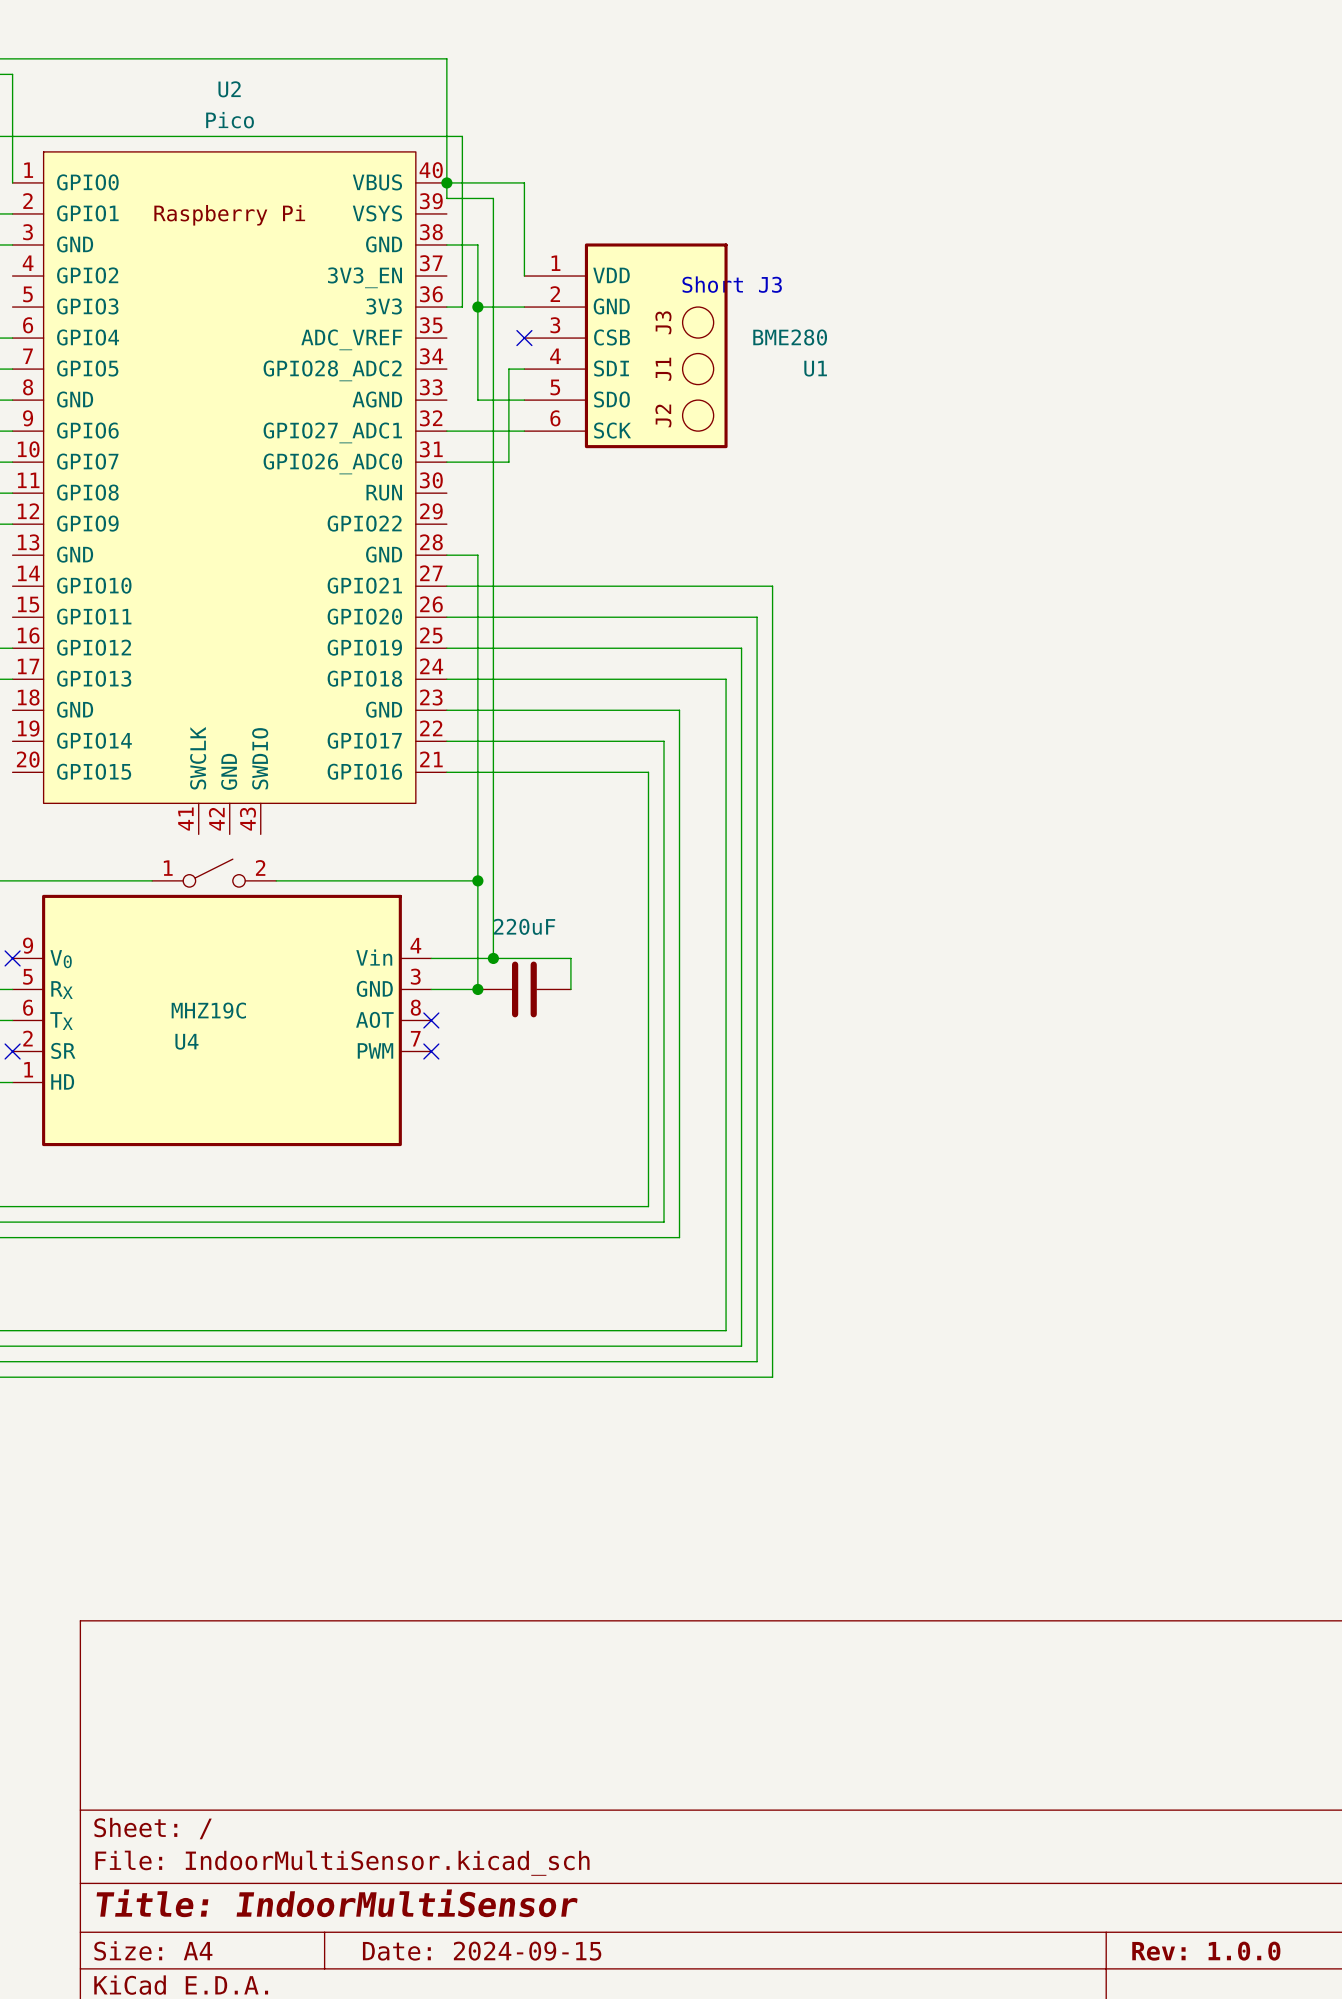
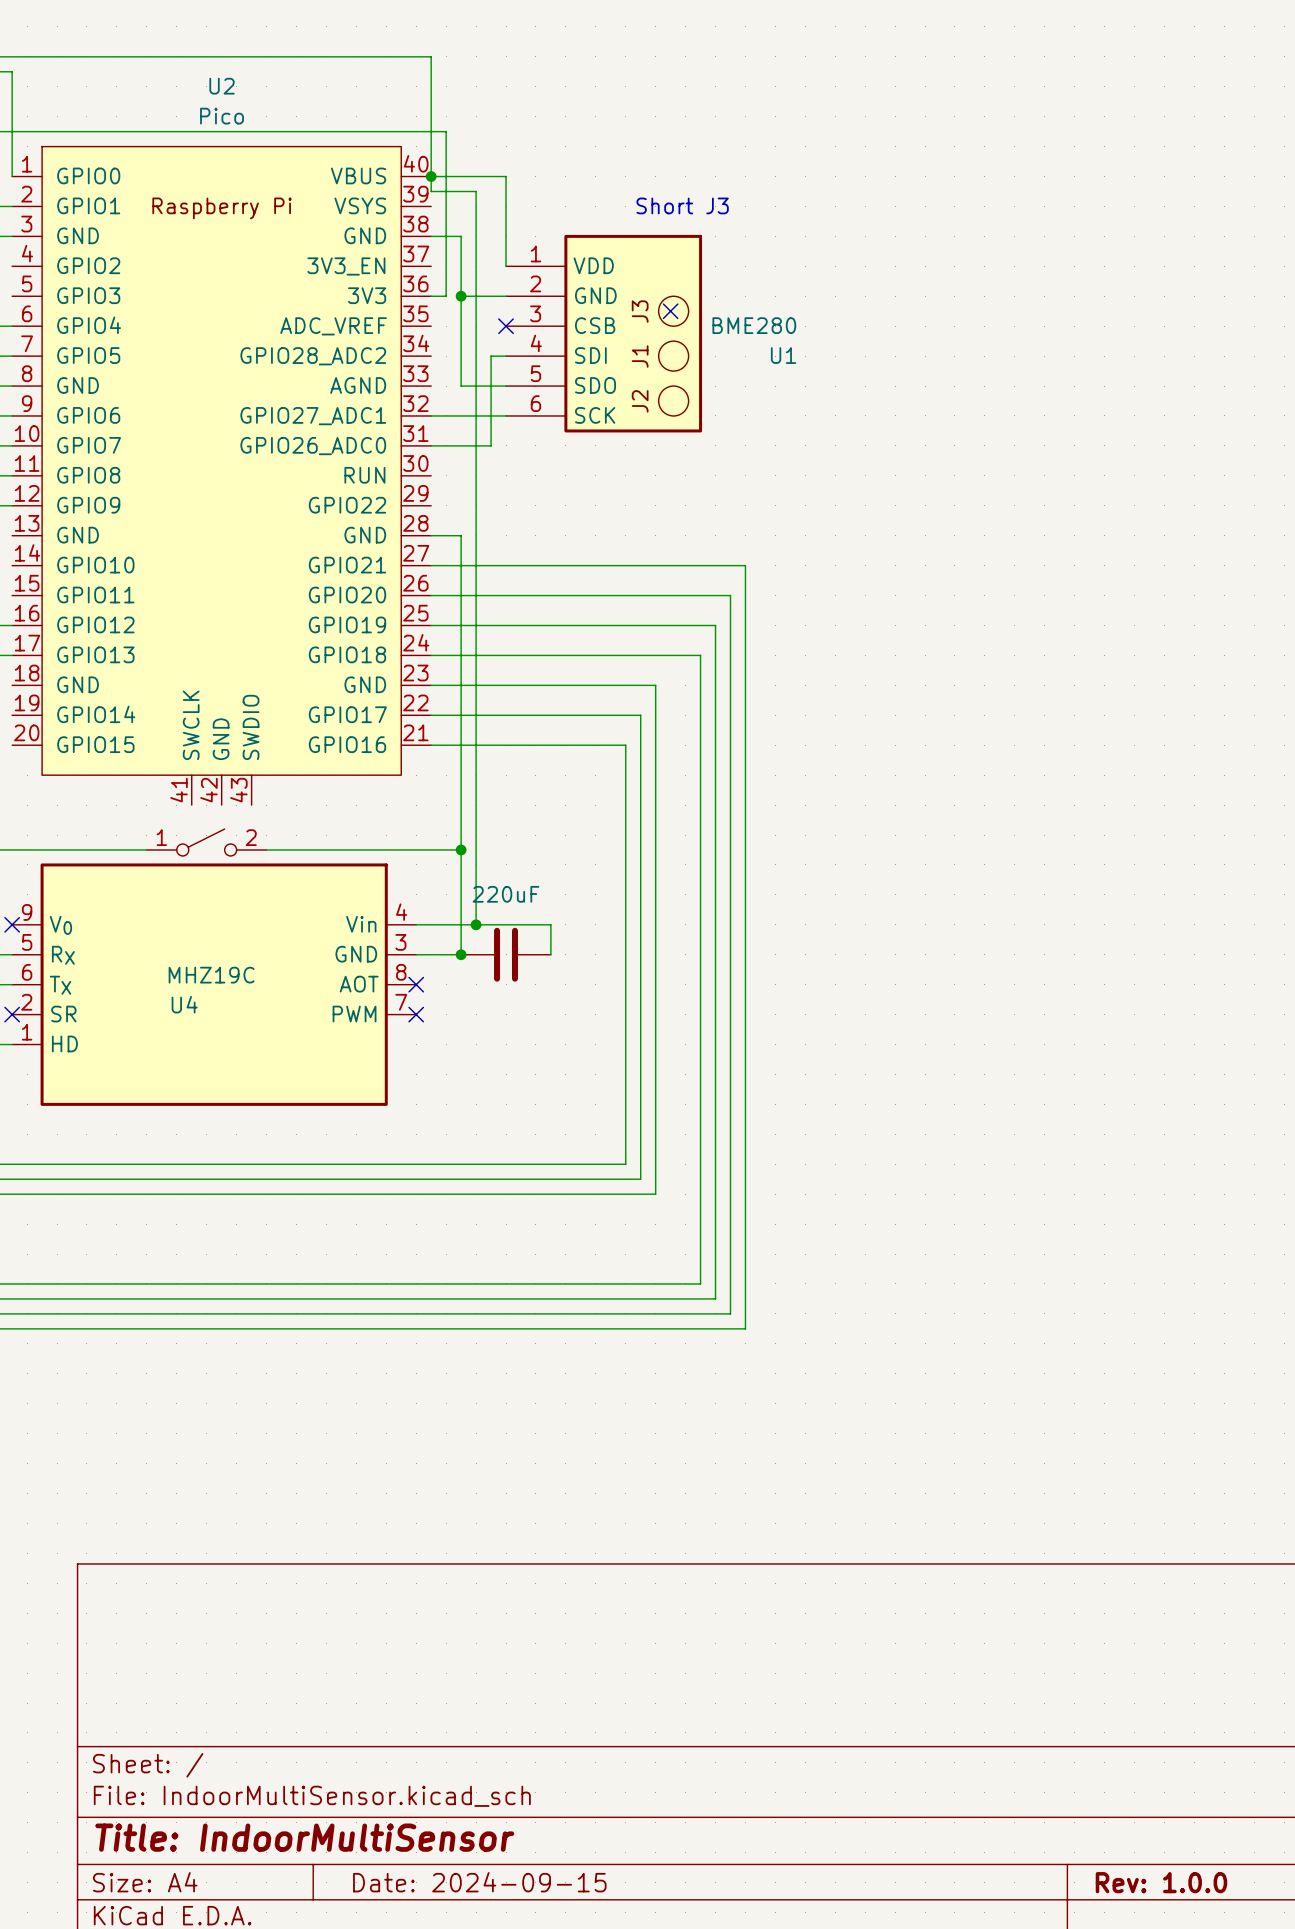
text position: Short J3 (732, 284) -> Short J3 (682, 205)
no-connect mark: none -> (670, 311)

